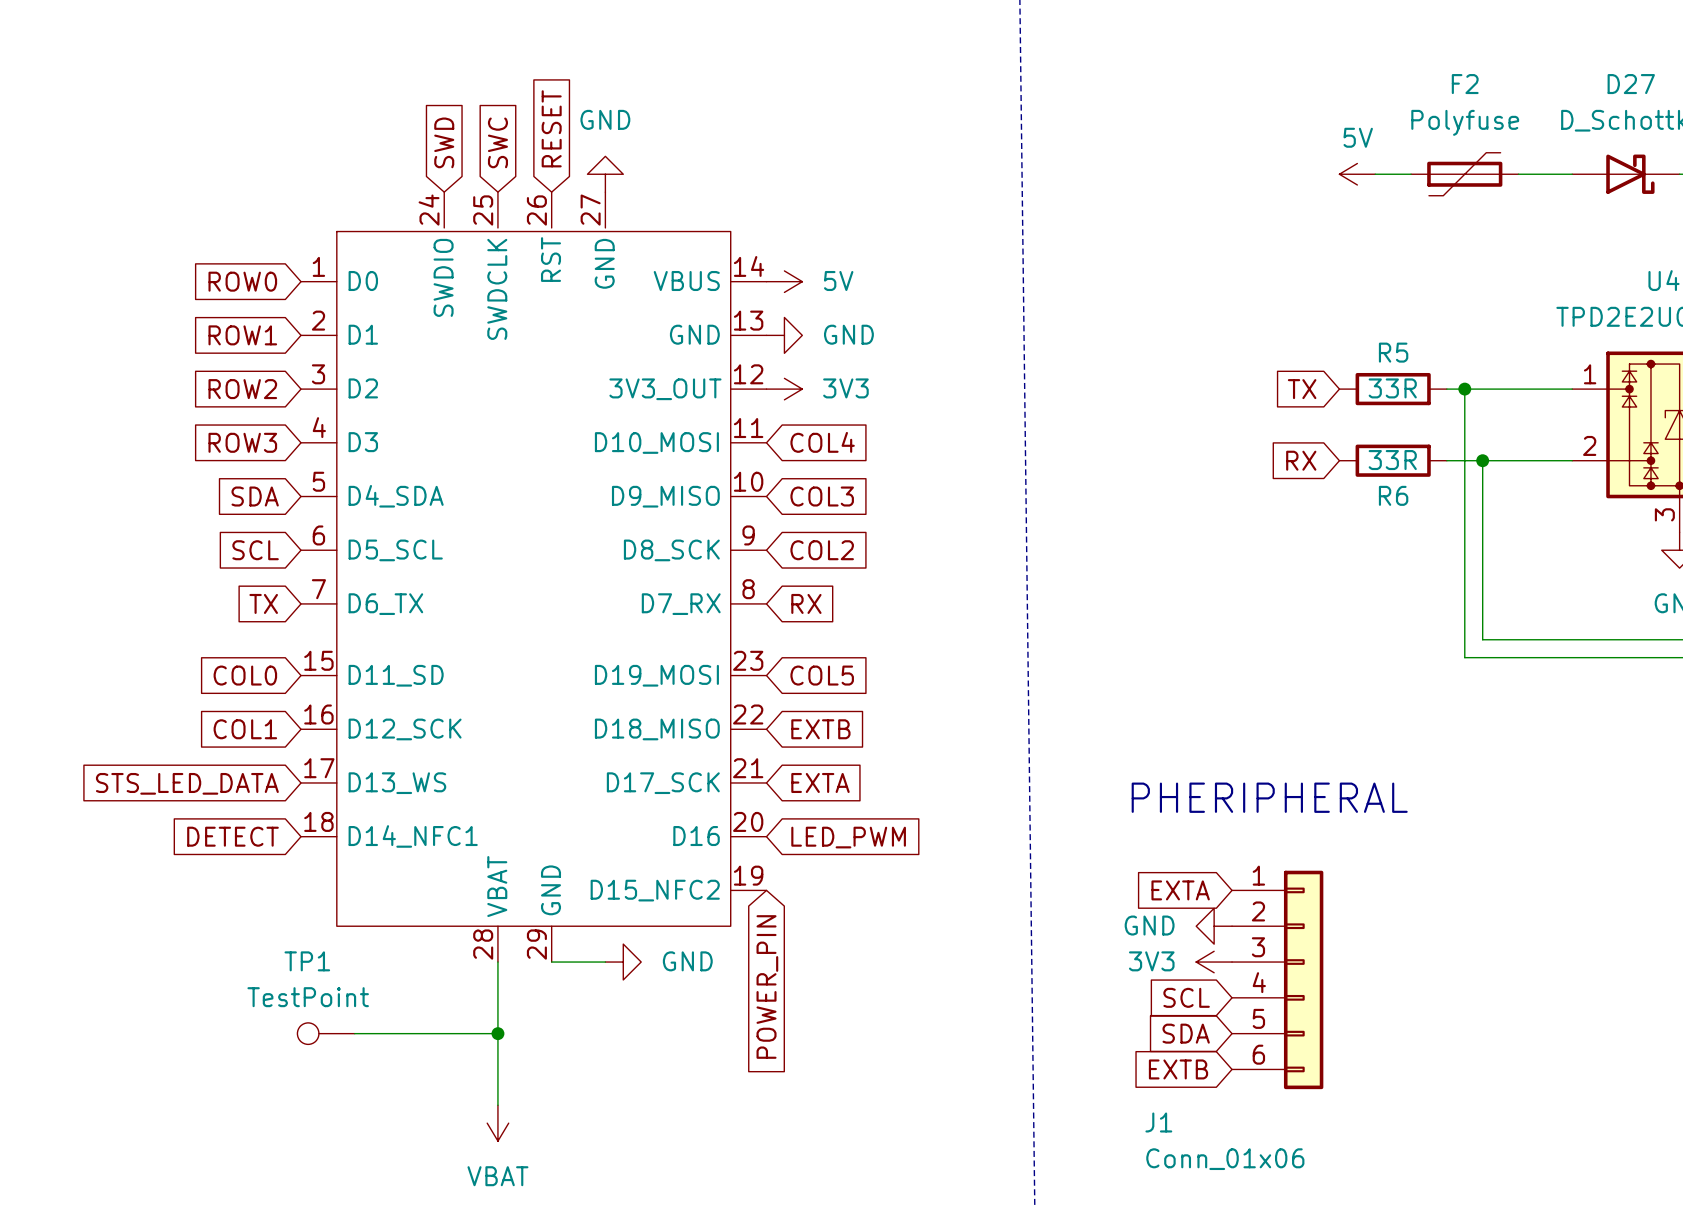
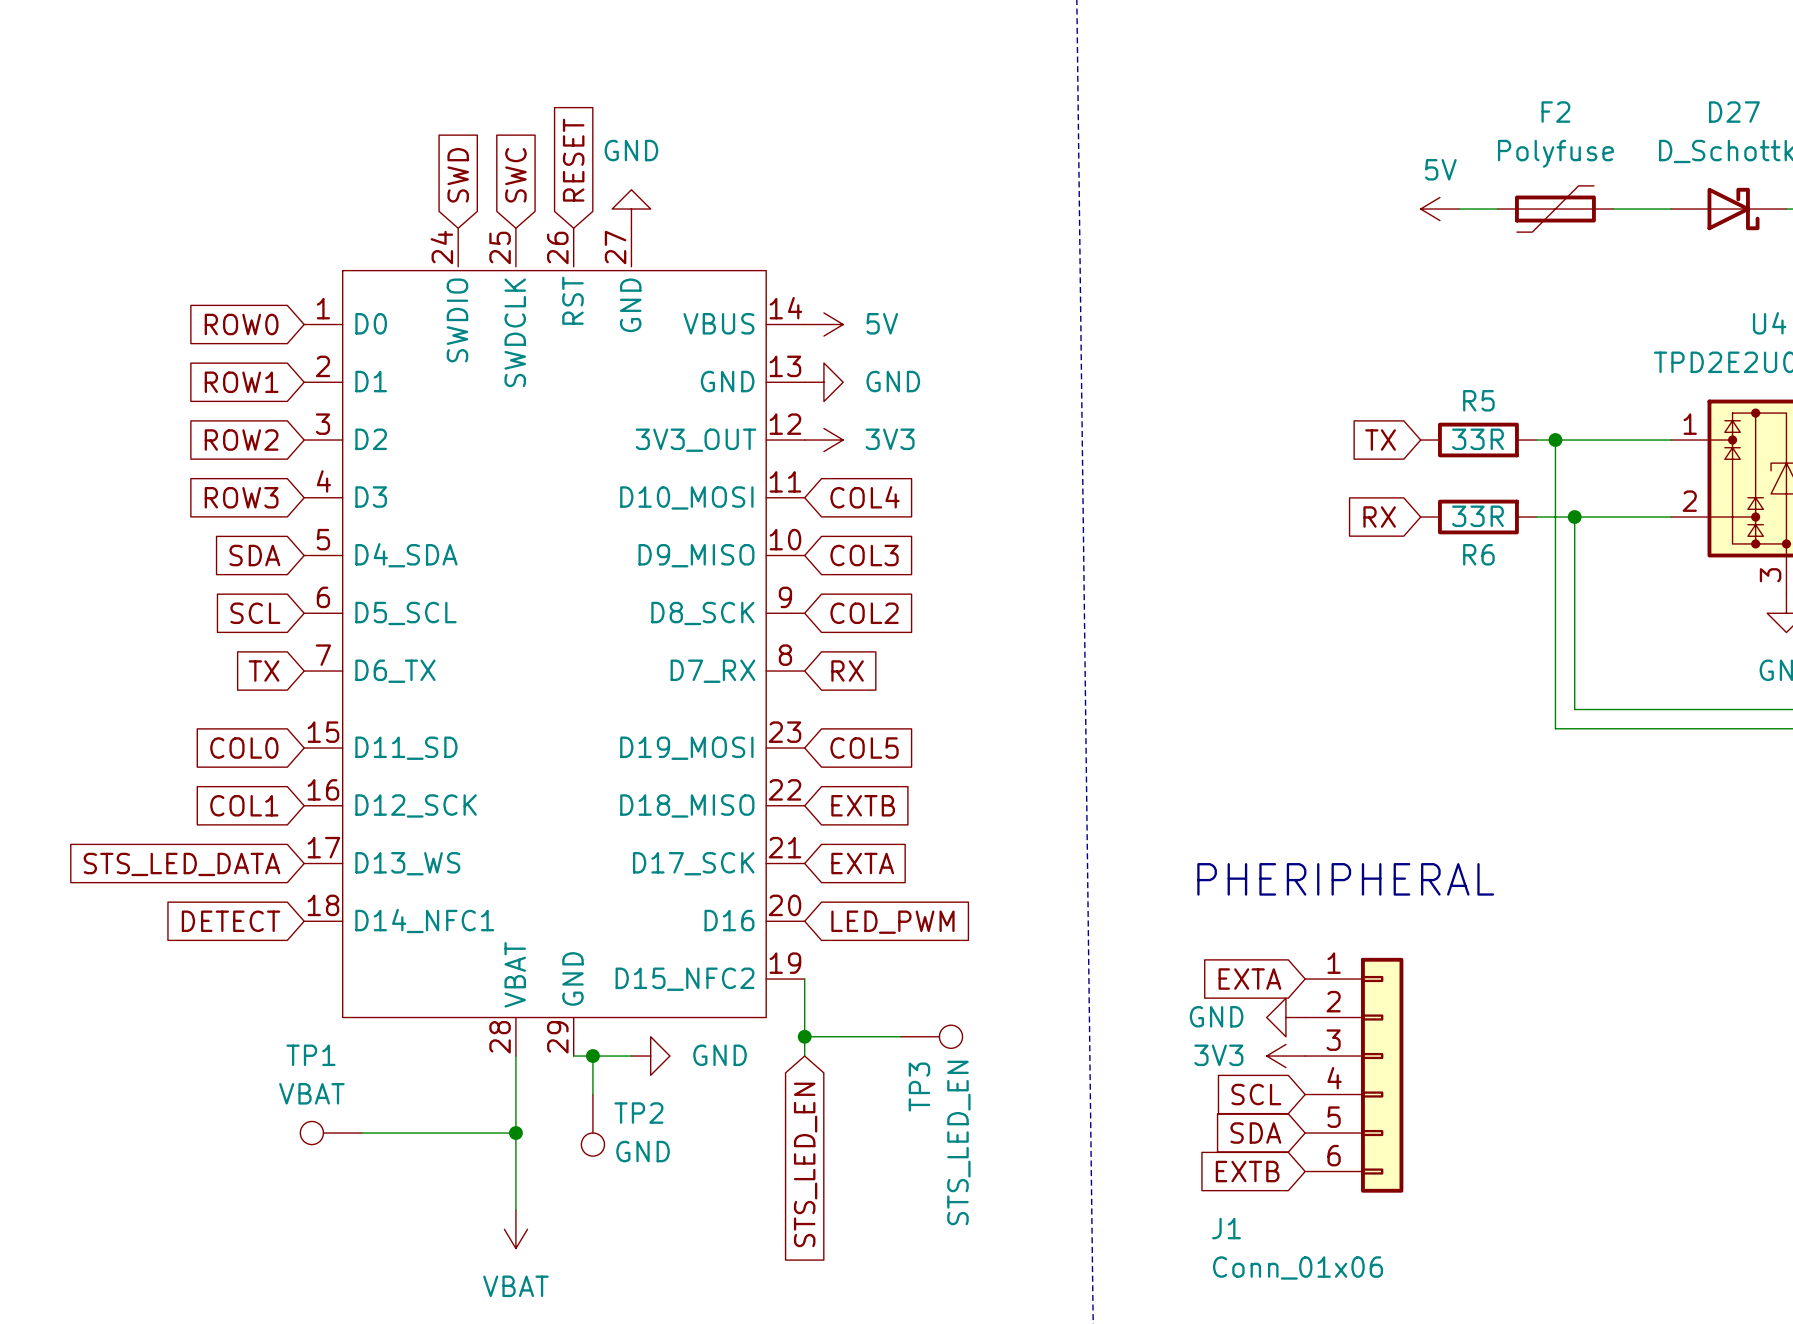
wire: none -> (804, 979) (804, 1056)
wire: none -> (804, 1036) (900, 1036)
junction: none -> (804, 1036)
TP3: none -> STS_LED_EN (931, 1036)
wire: none -> (592, 1056) (592, 1094)
junction: none -> (592, 1056)
global label: POWER_PIN (767, 986) -> none
TP1 value: TestPoint (308, 997) -> VBAT (311, 1093)
TP2: none -> GND (592, 1125)
global label: none -> STS_LED_EN (805, 1164)

